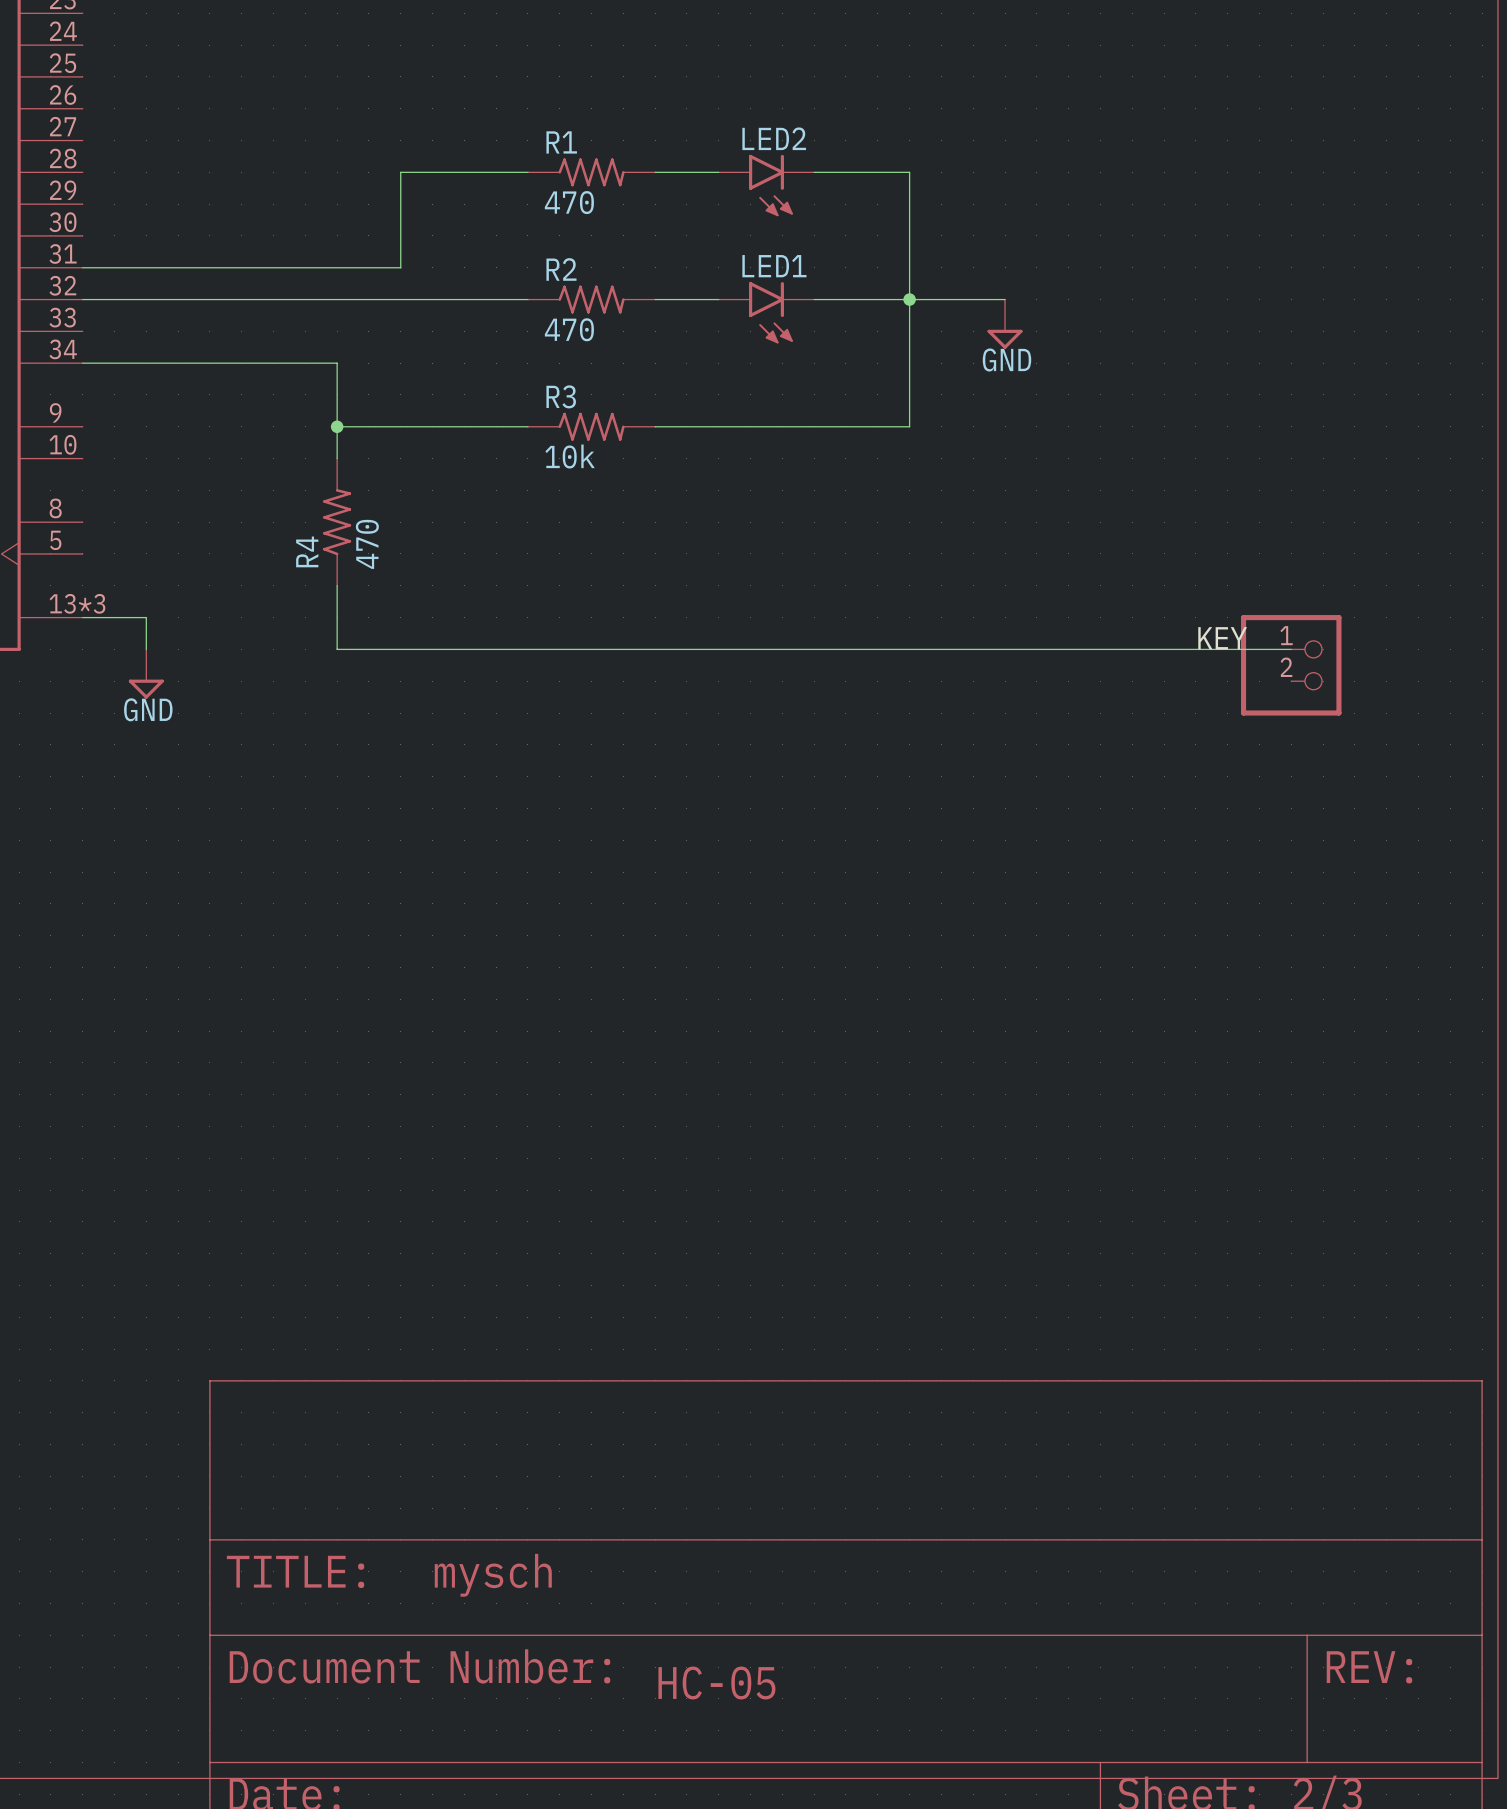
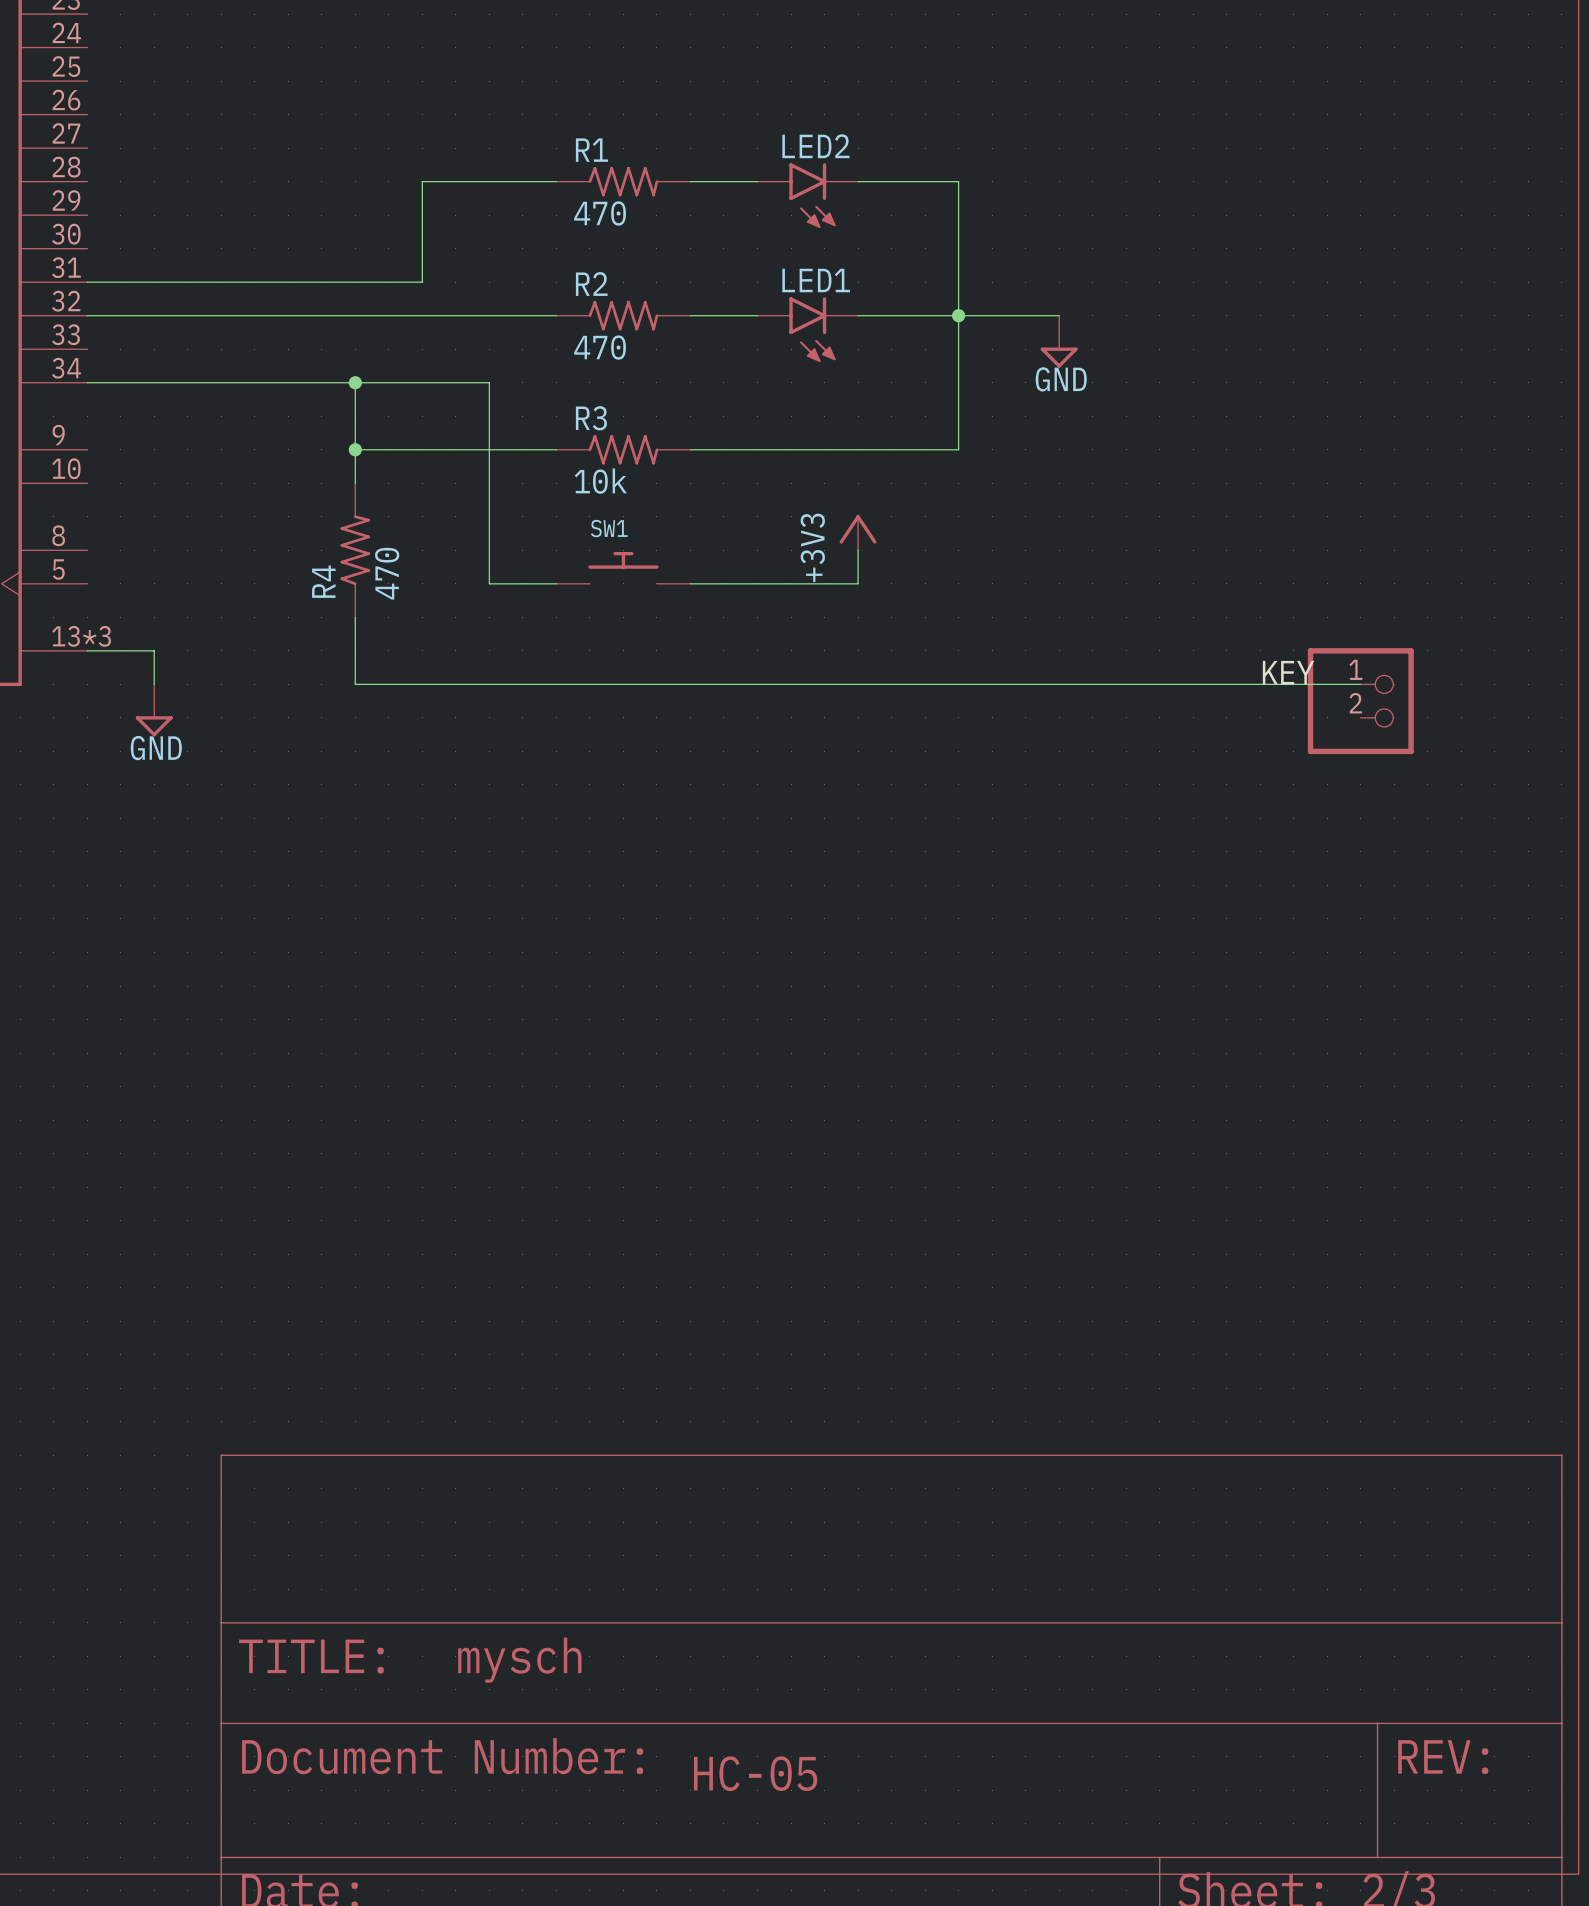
wire: none -> (355, 382) (489, 382) (489, 583) (556, 583)
junction: none -> (355, 382)
power symbol: none -> +3V3 (858, 532)
wire: none -> (858, 550) (858, 583) (690, 583)
SW1: none -> (623, 567)

